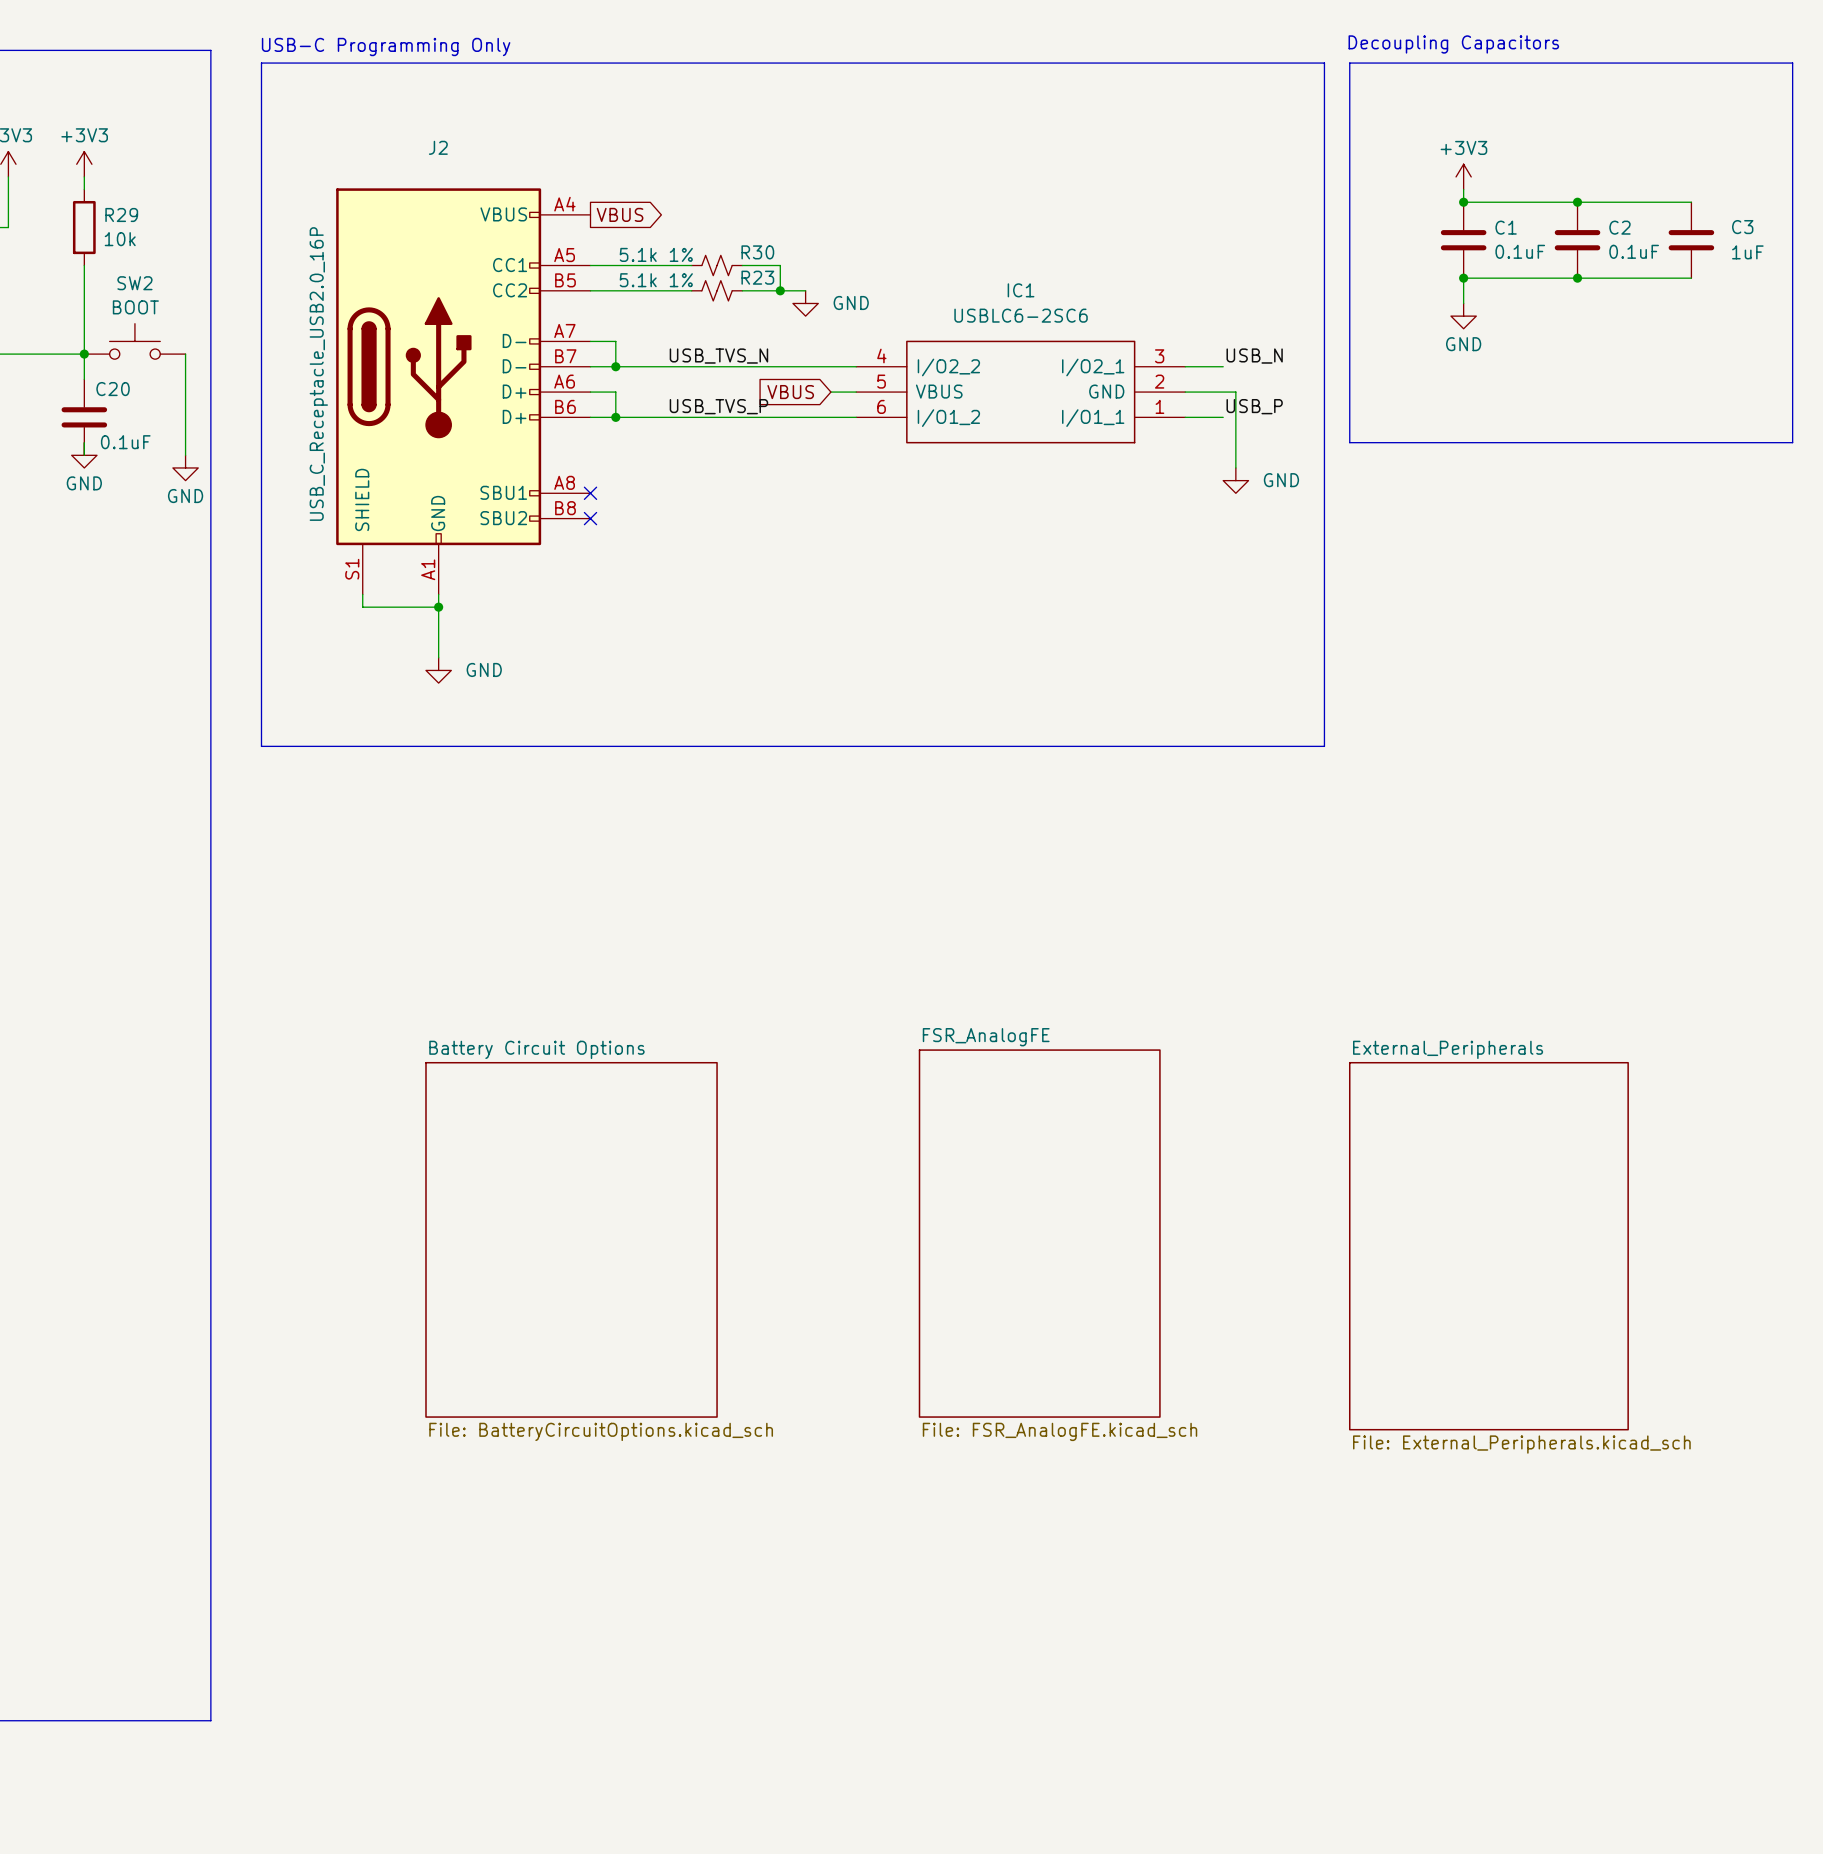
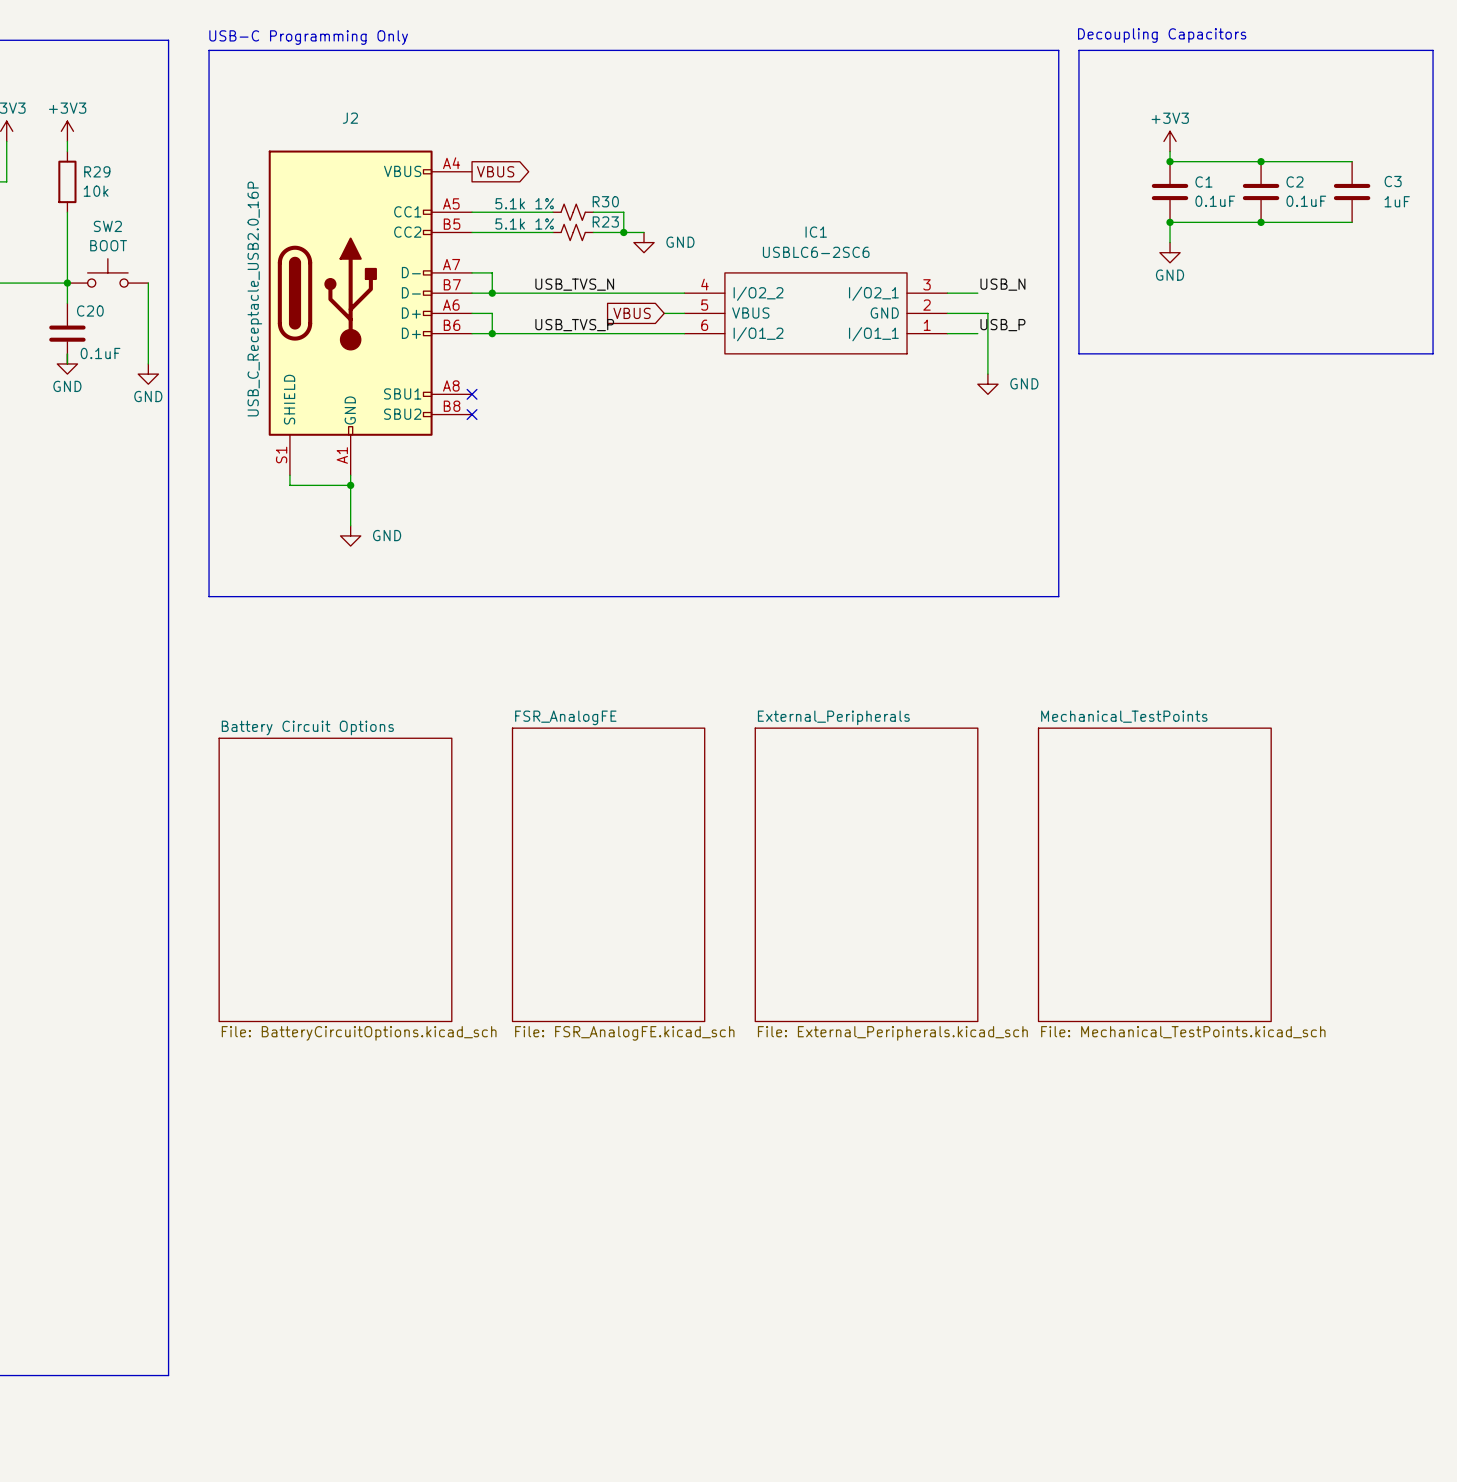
sheet FSR_AnalogFE: none -> File: FSR_AnalogFE.kicad_sch (608, 874)
sheet External_Peripherals: none -> File: External_Peripherals.kicad_sch (866, 874)
sheet Mechanical_TestPoints: none -> File: Mechanical_TestPoints.kicad_sch (1154, 874)
sheet FSR_AnalogFE: File: FSR_AnalogFE.kicad_sch (1039, 1233) -> none
sheet Battery Circuit Options position: (571, 1239) -> (335, 879)
sheet External_Peripherals: File: External_Peripherals.kicad_sch (1488, 1246) -> none

